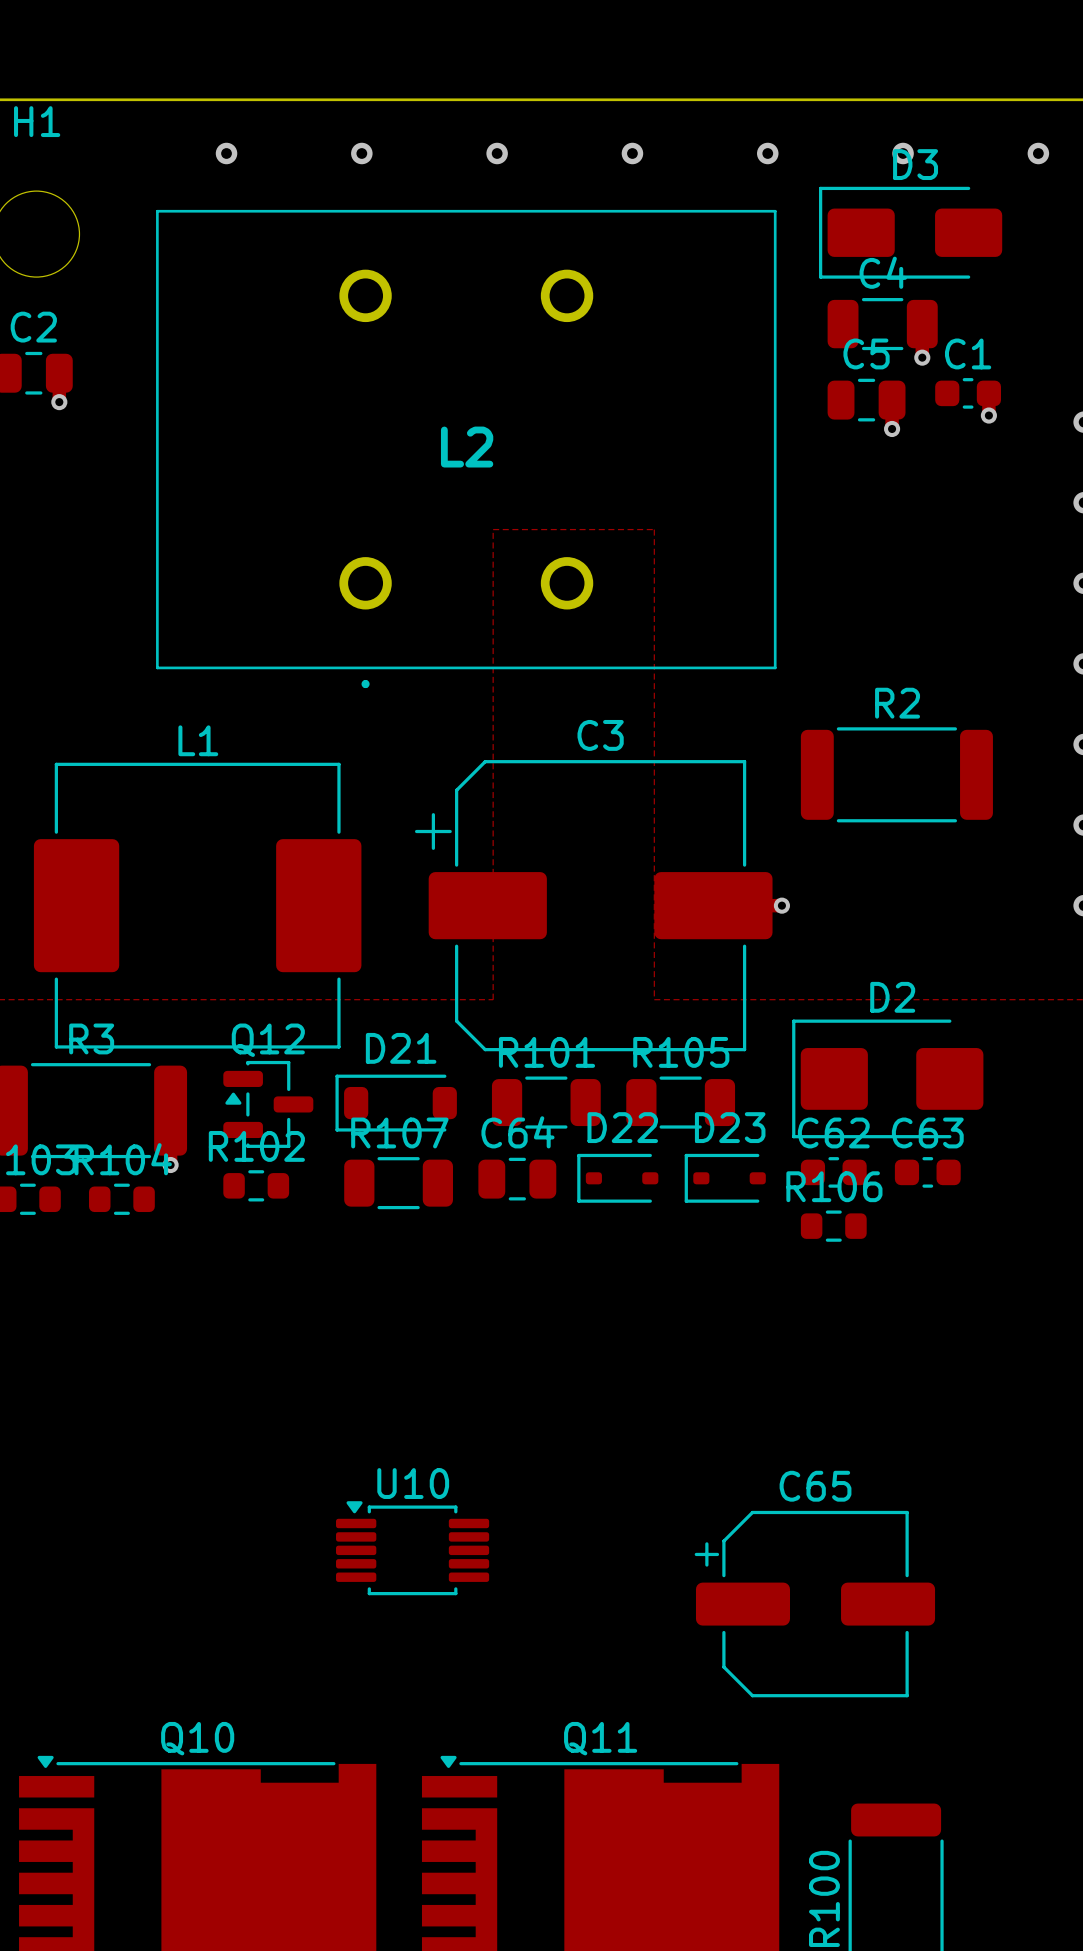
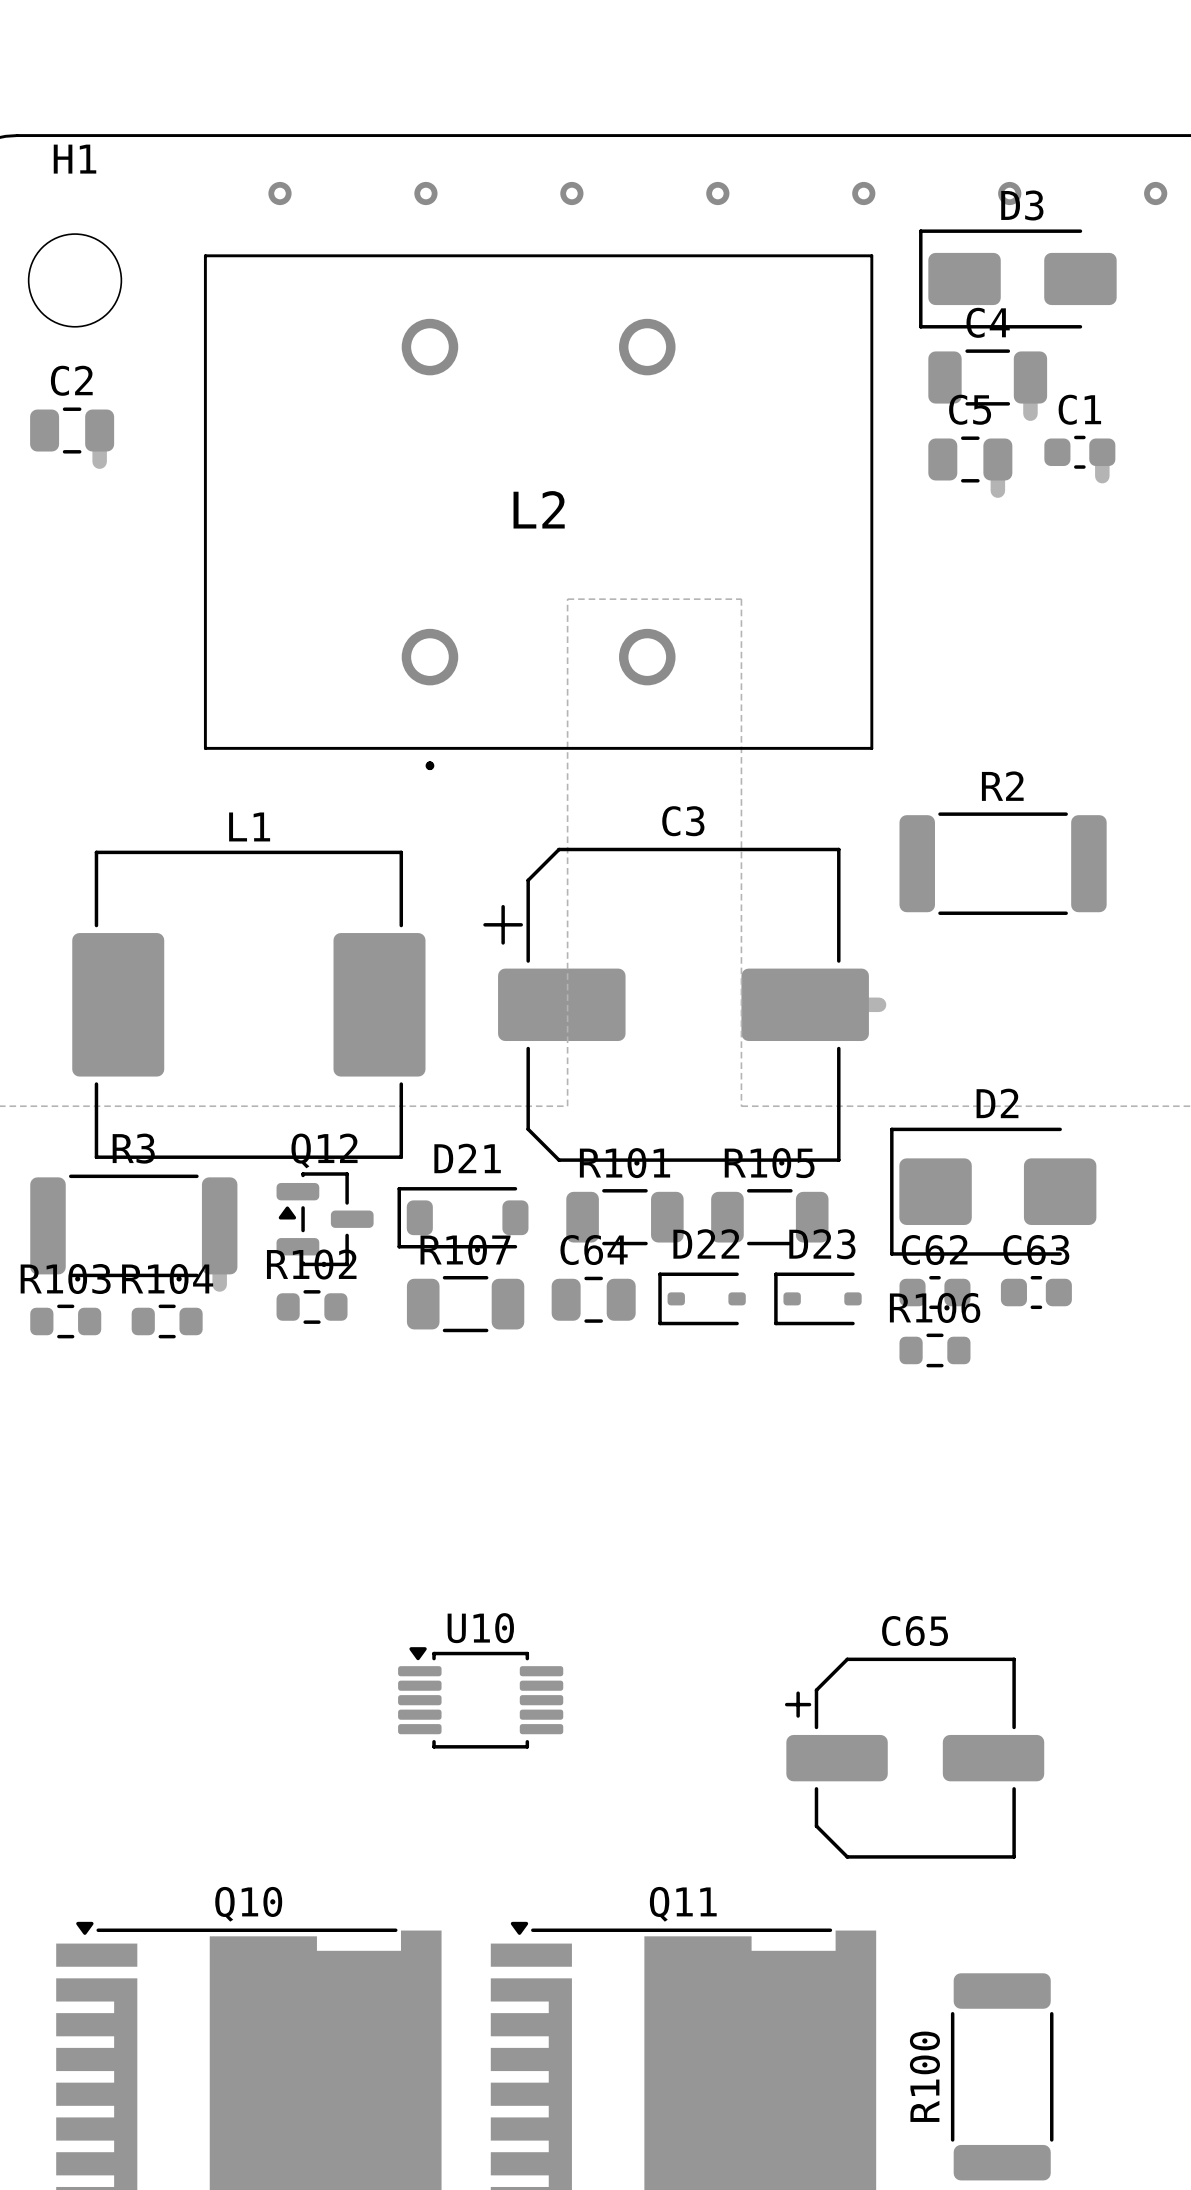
via: (922, 357) -> none
via: (59, 402) -> none
via: (988, 415) -> none
via: (892, 428) -> none
via: (781, 905) -> none
via: (170, 1165) -> none

